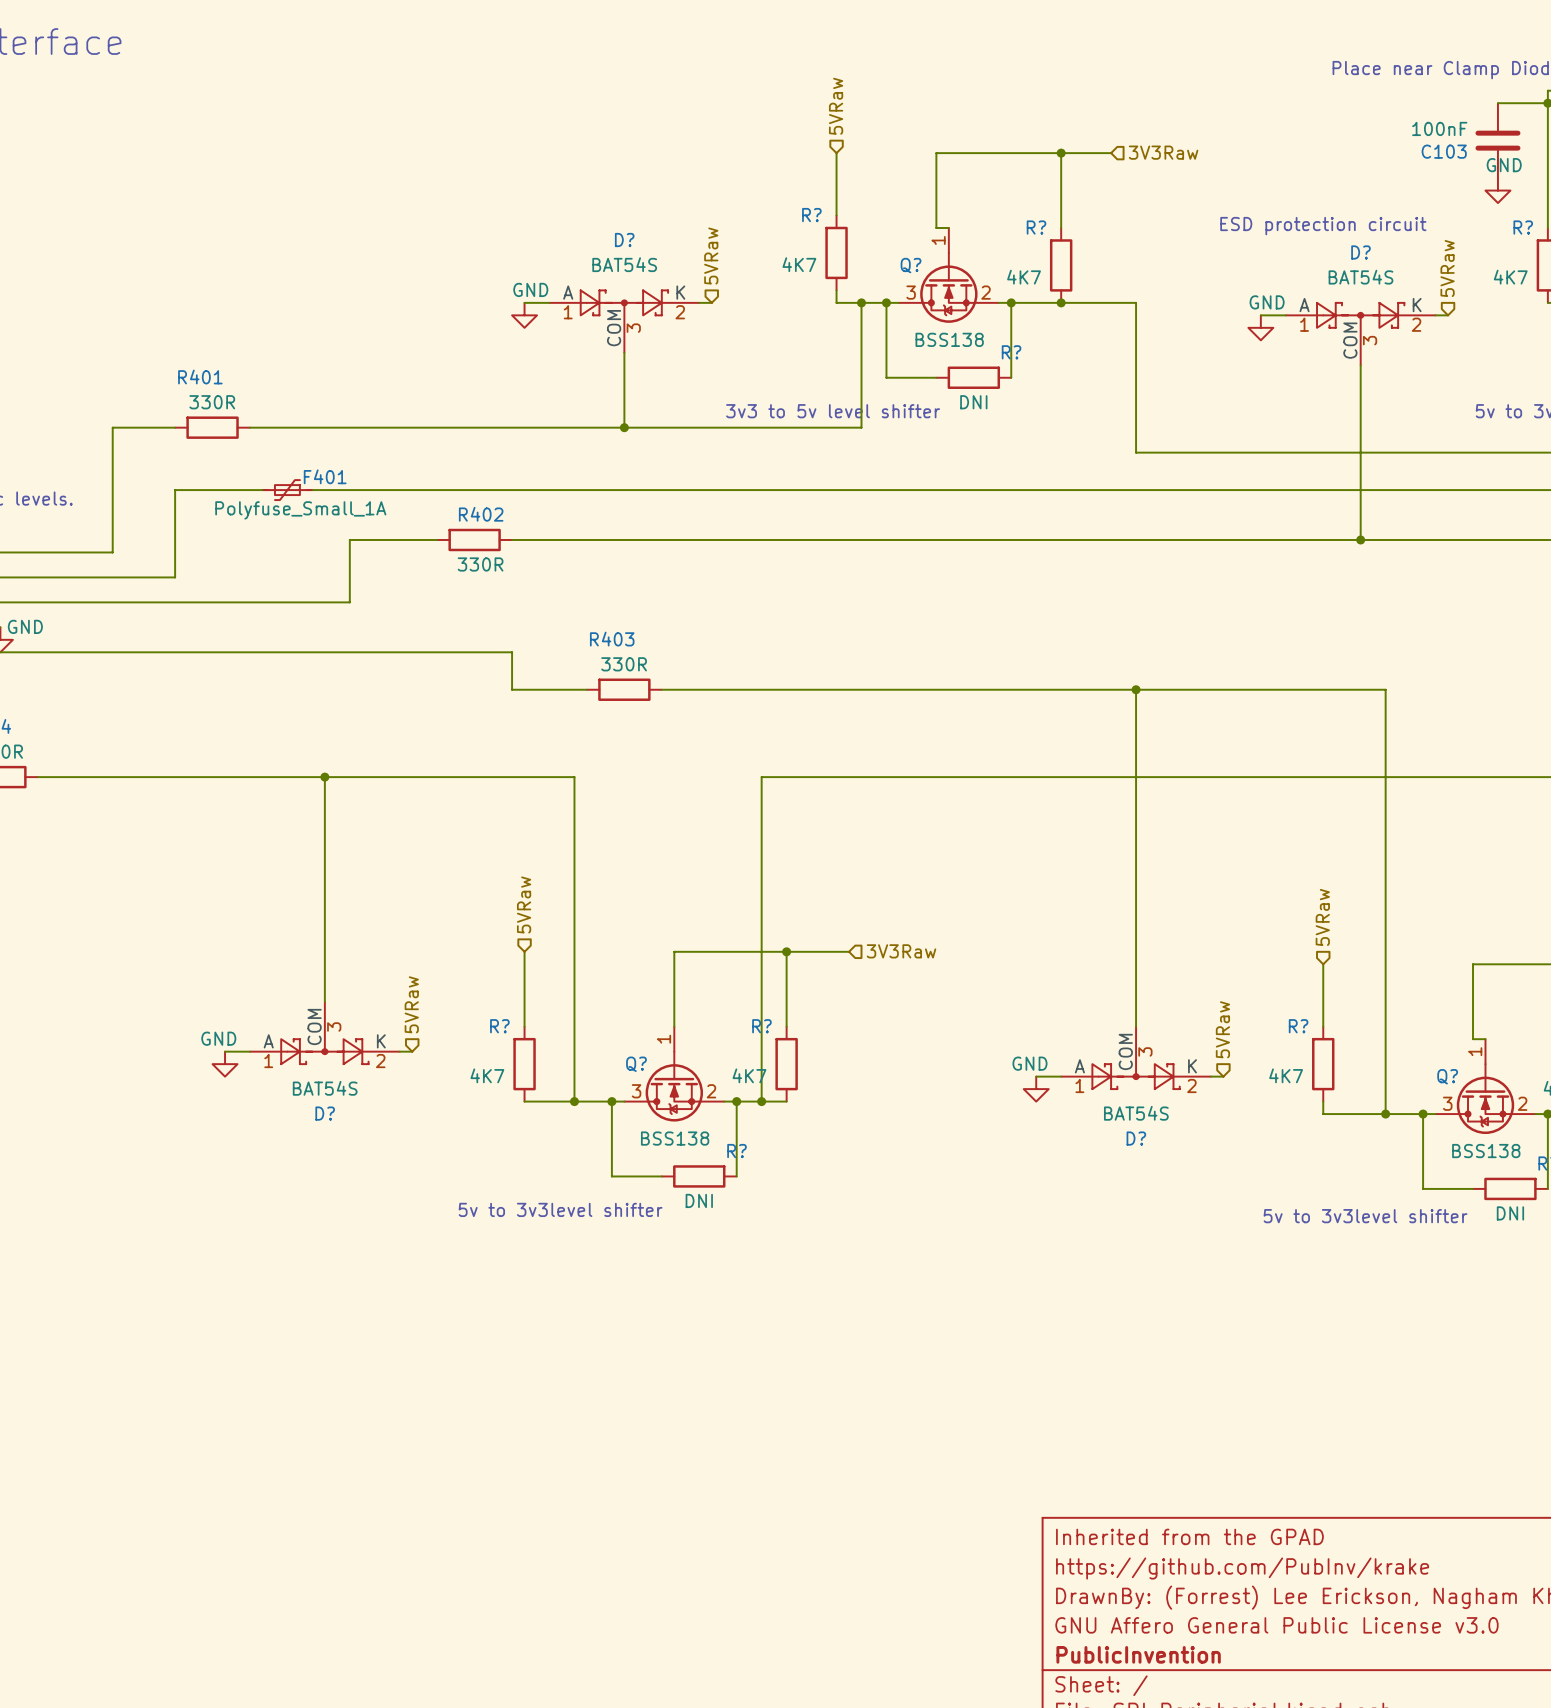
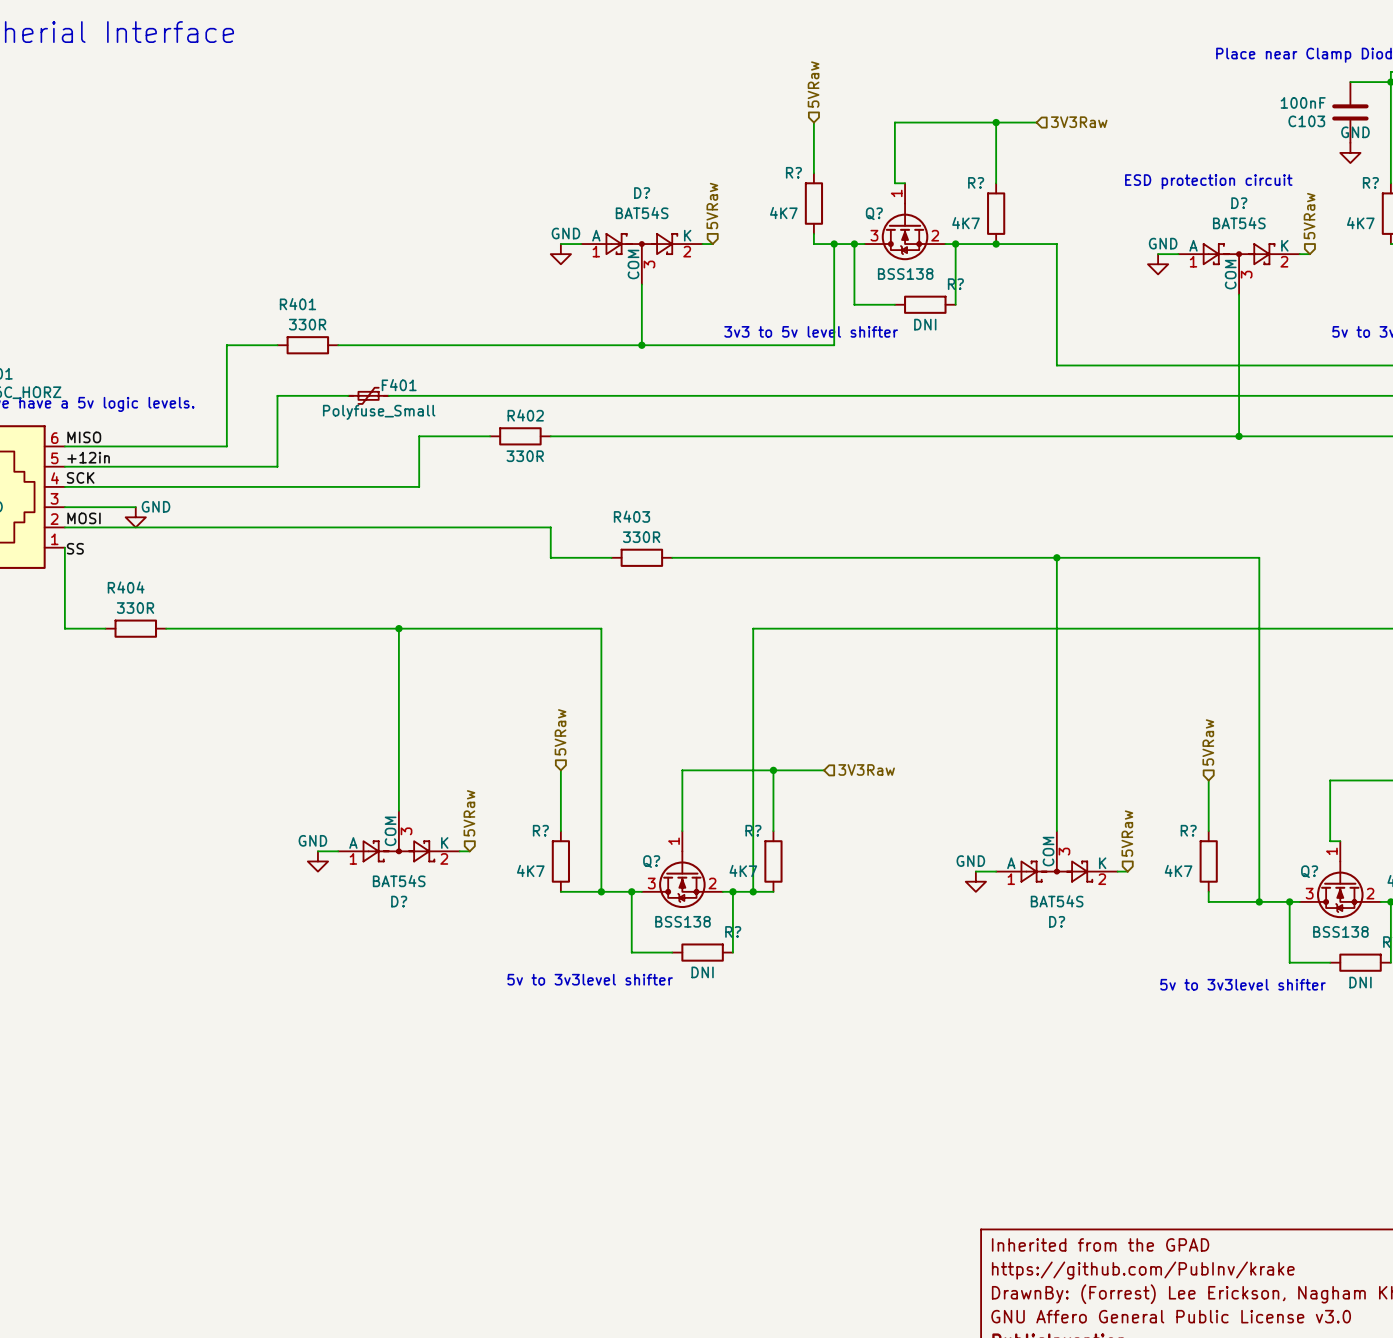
F401 value: Polyfuse_Small_1A (300, 510) -> Polyfuse_Small (379, 412)

